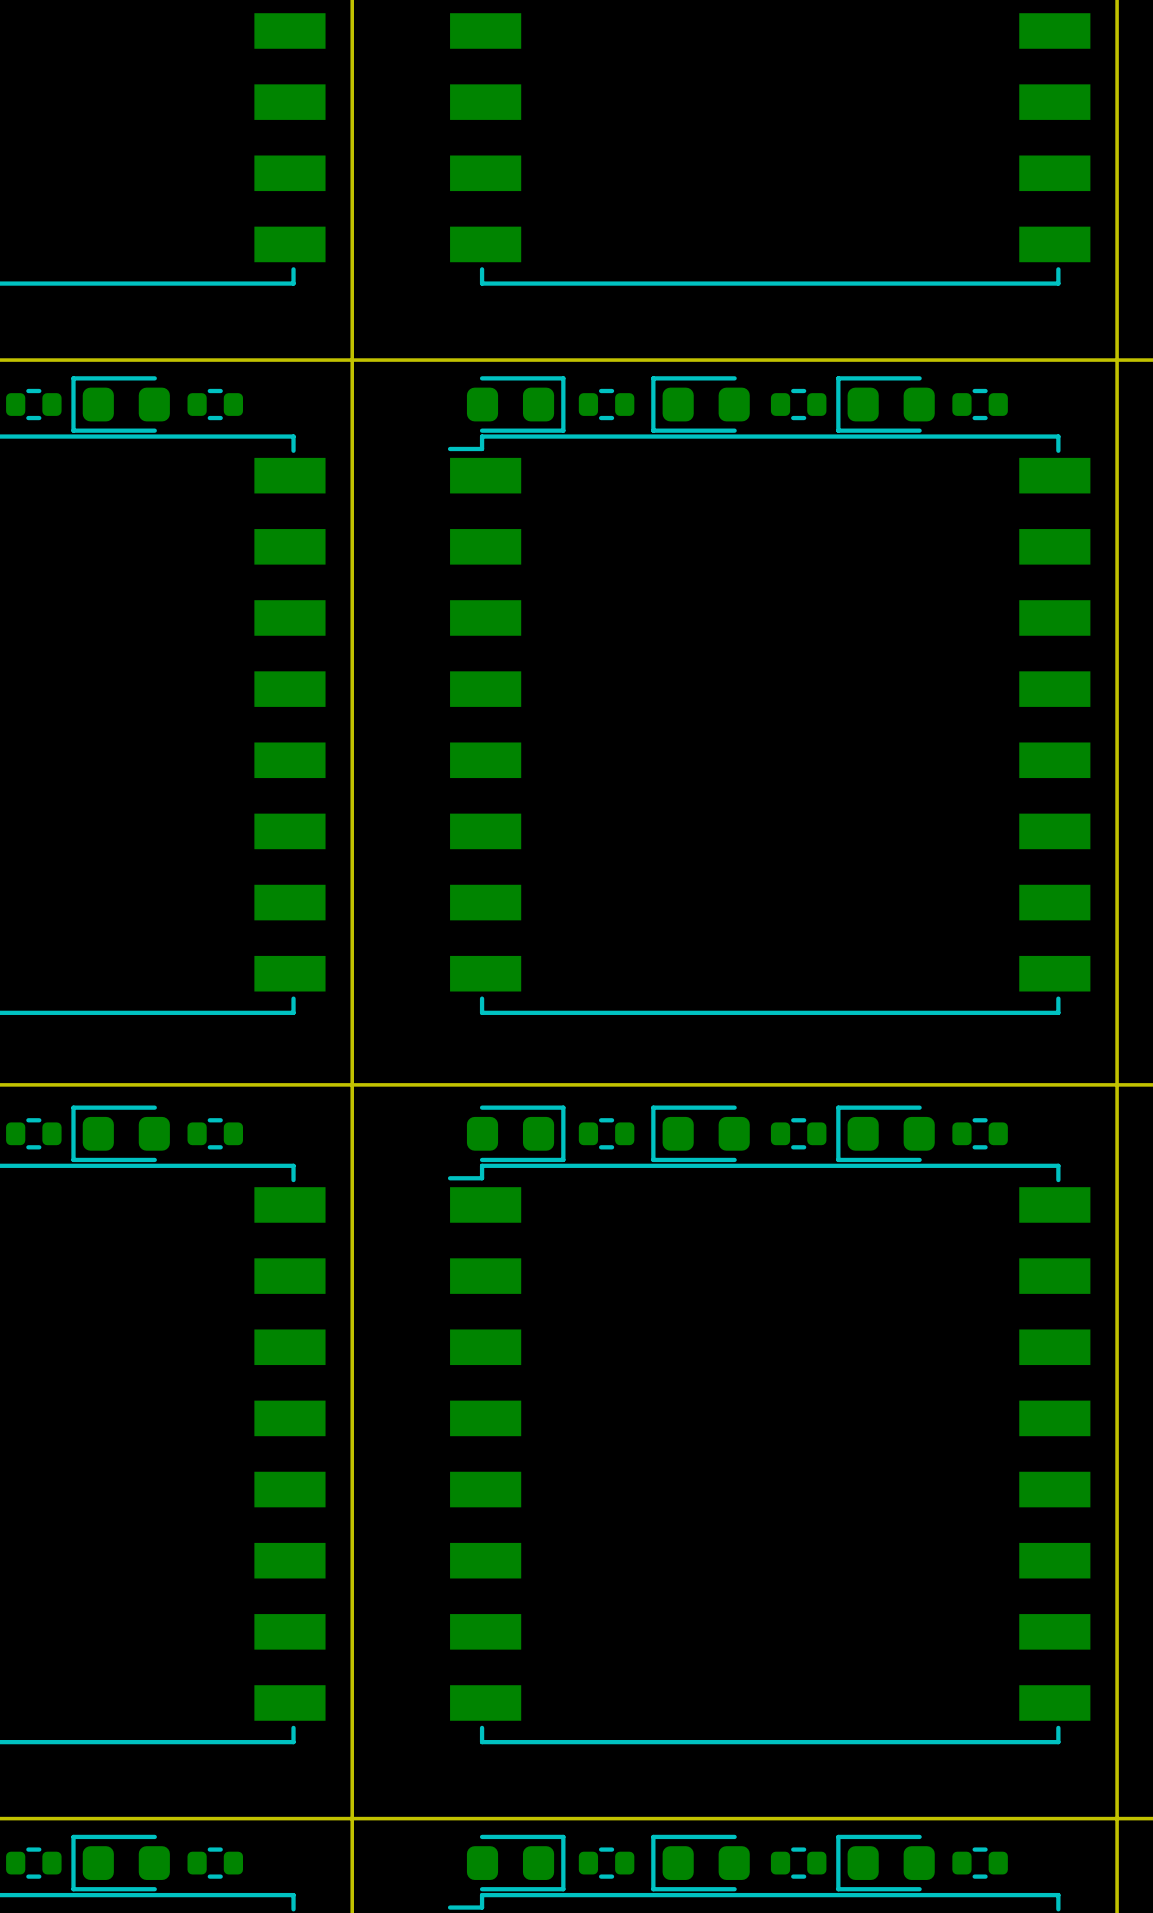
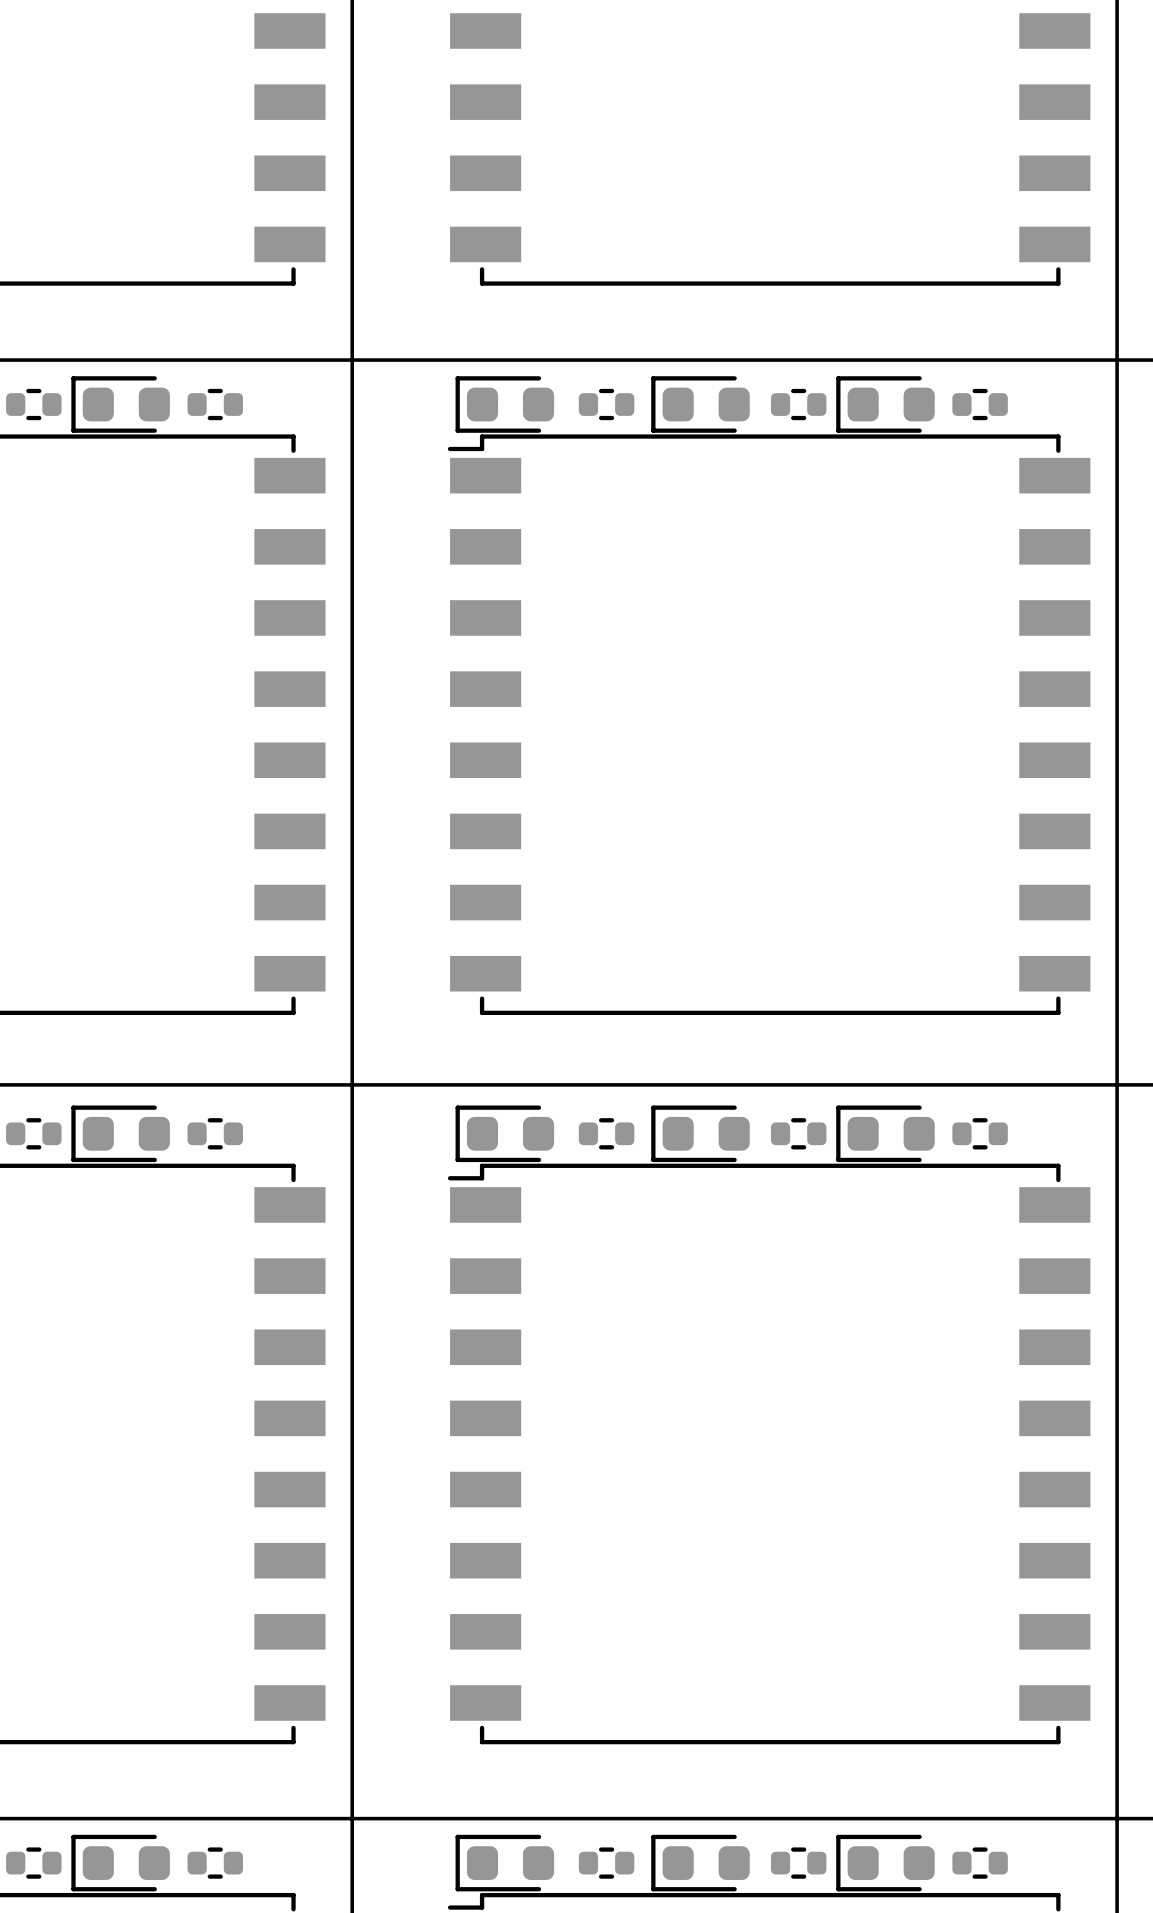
part rotation: 0° (516, 404) -> 180° (504, 404)
part rotation: 0° (516, 1133) -> 180° (504, 1133)
part rotation: 0° (516, 1863) -> 180° (504, 1863)

